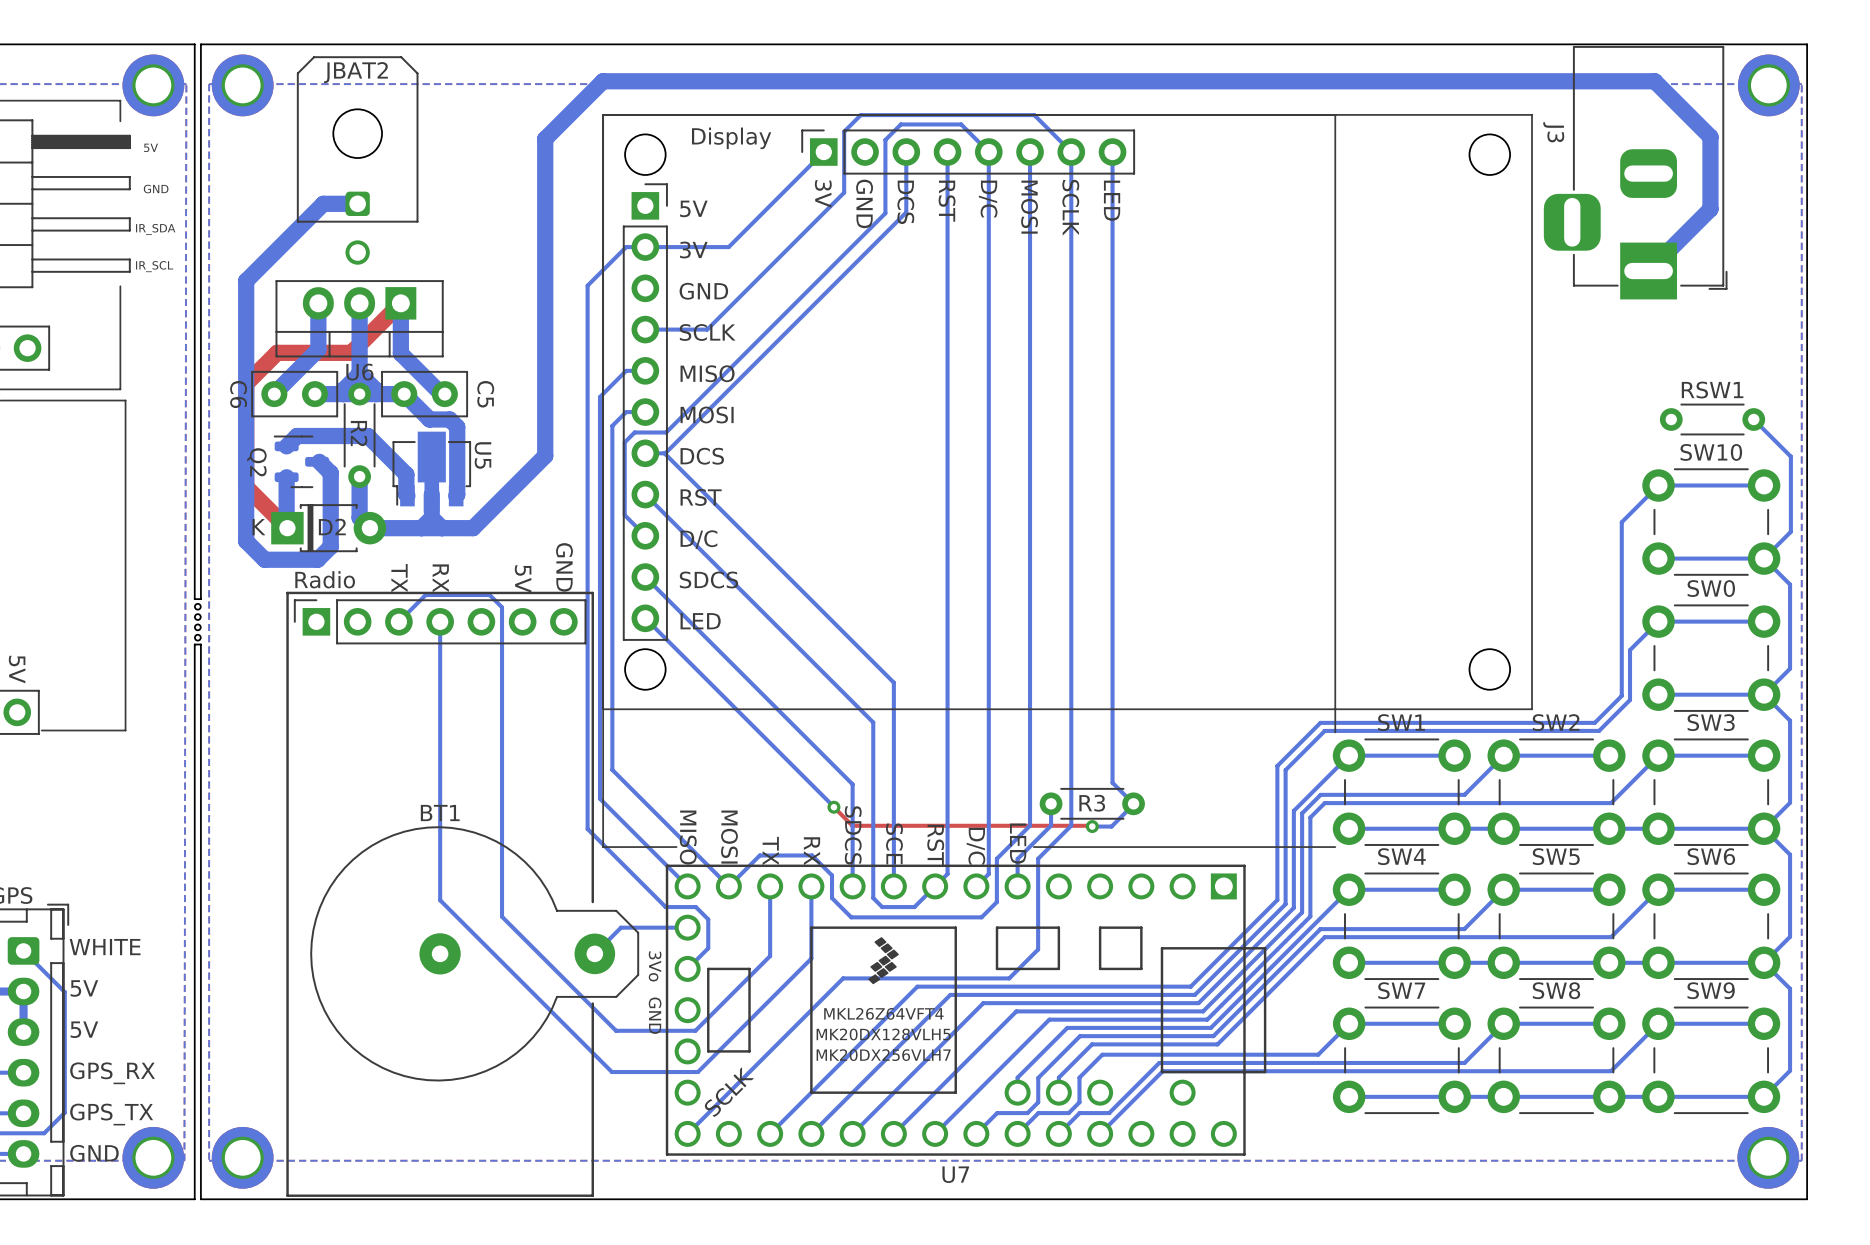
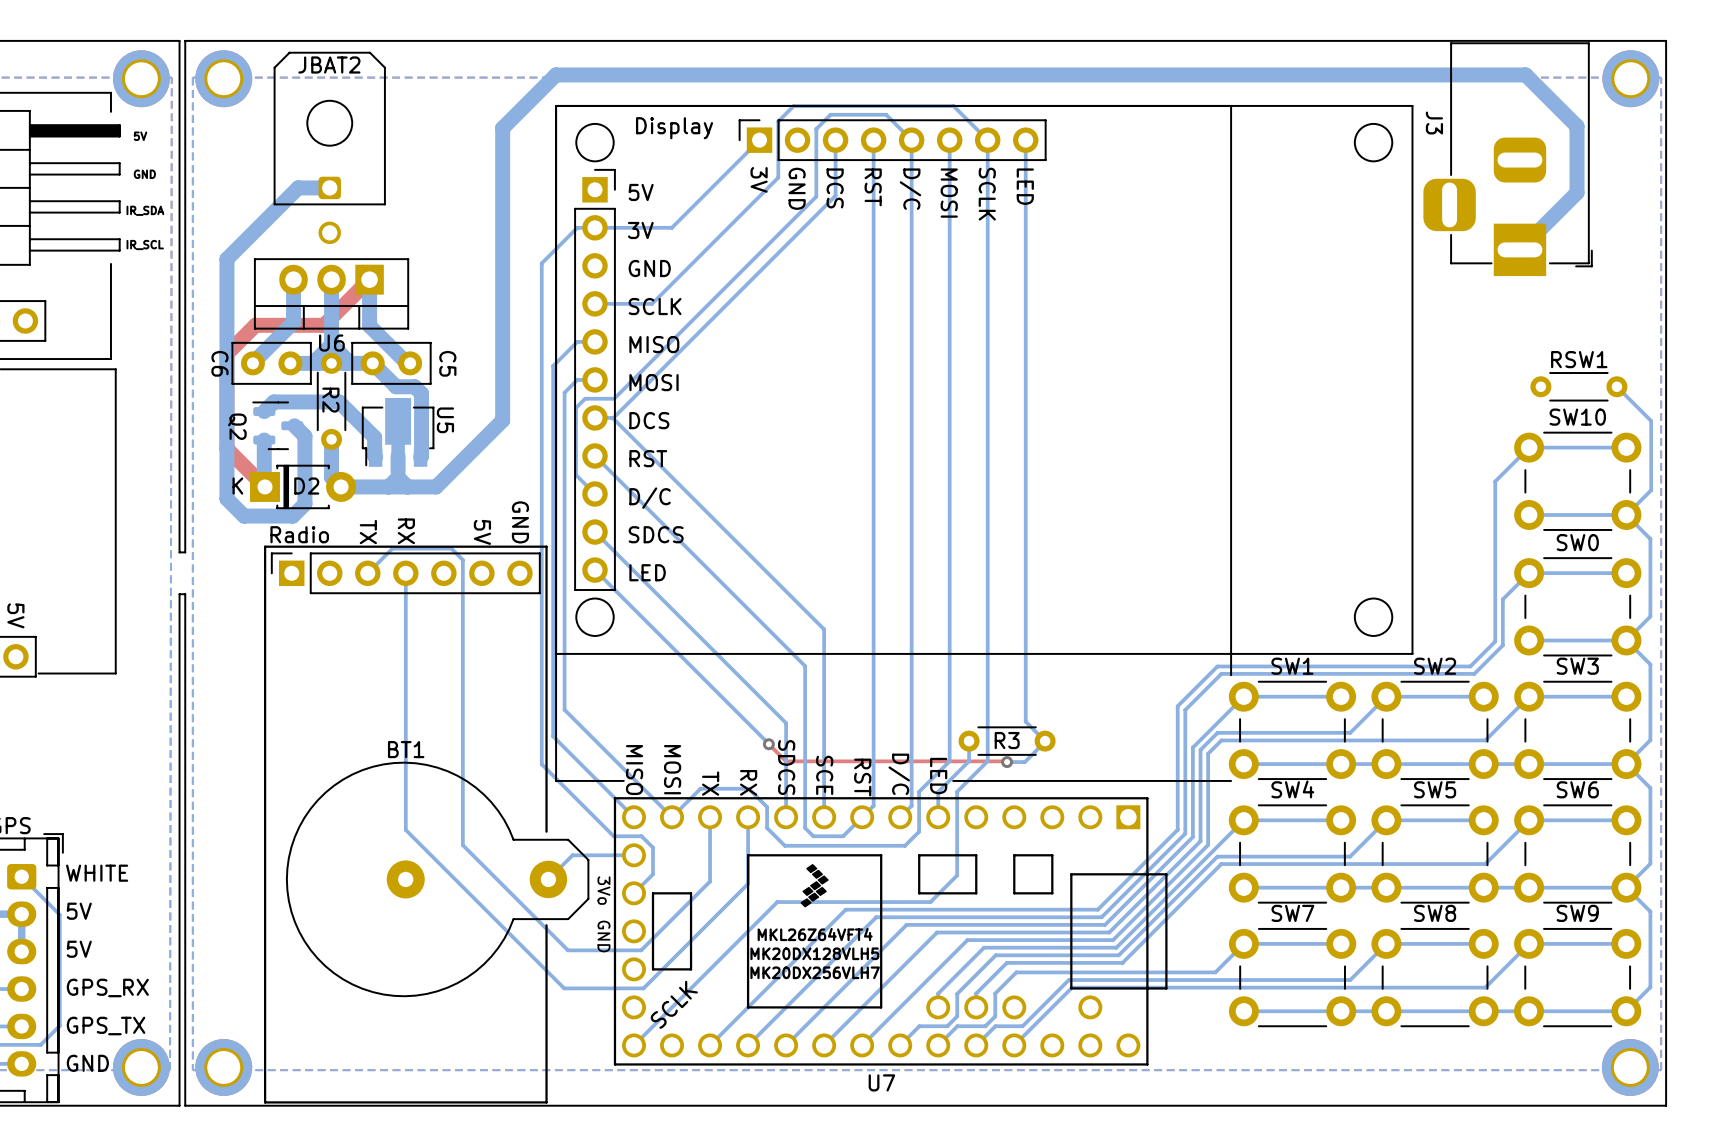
round board edge: [194, 603, 202, 611] -> none
round board edge: [194, 613, 202, 621] -> none
round board edge: [194, 624, 202, 631] -> none
round board edge: [194, 634, 202, 641] -> none

